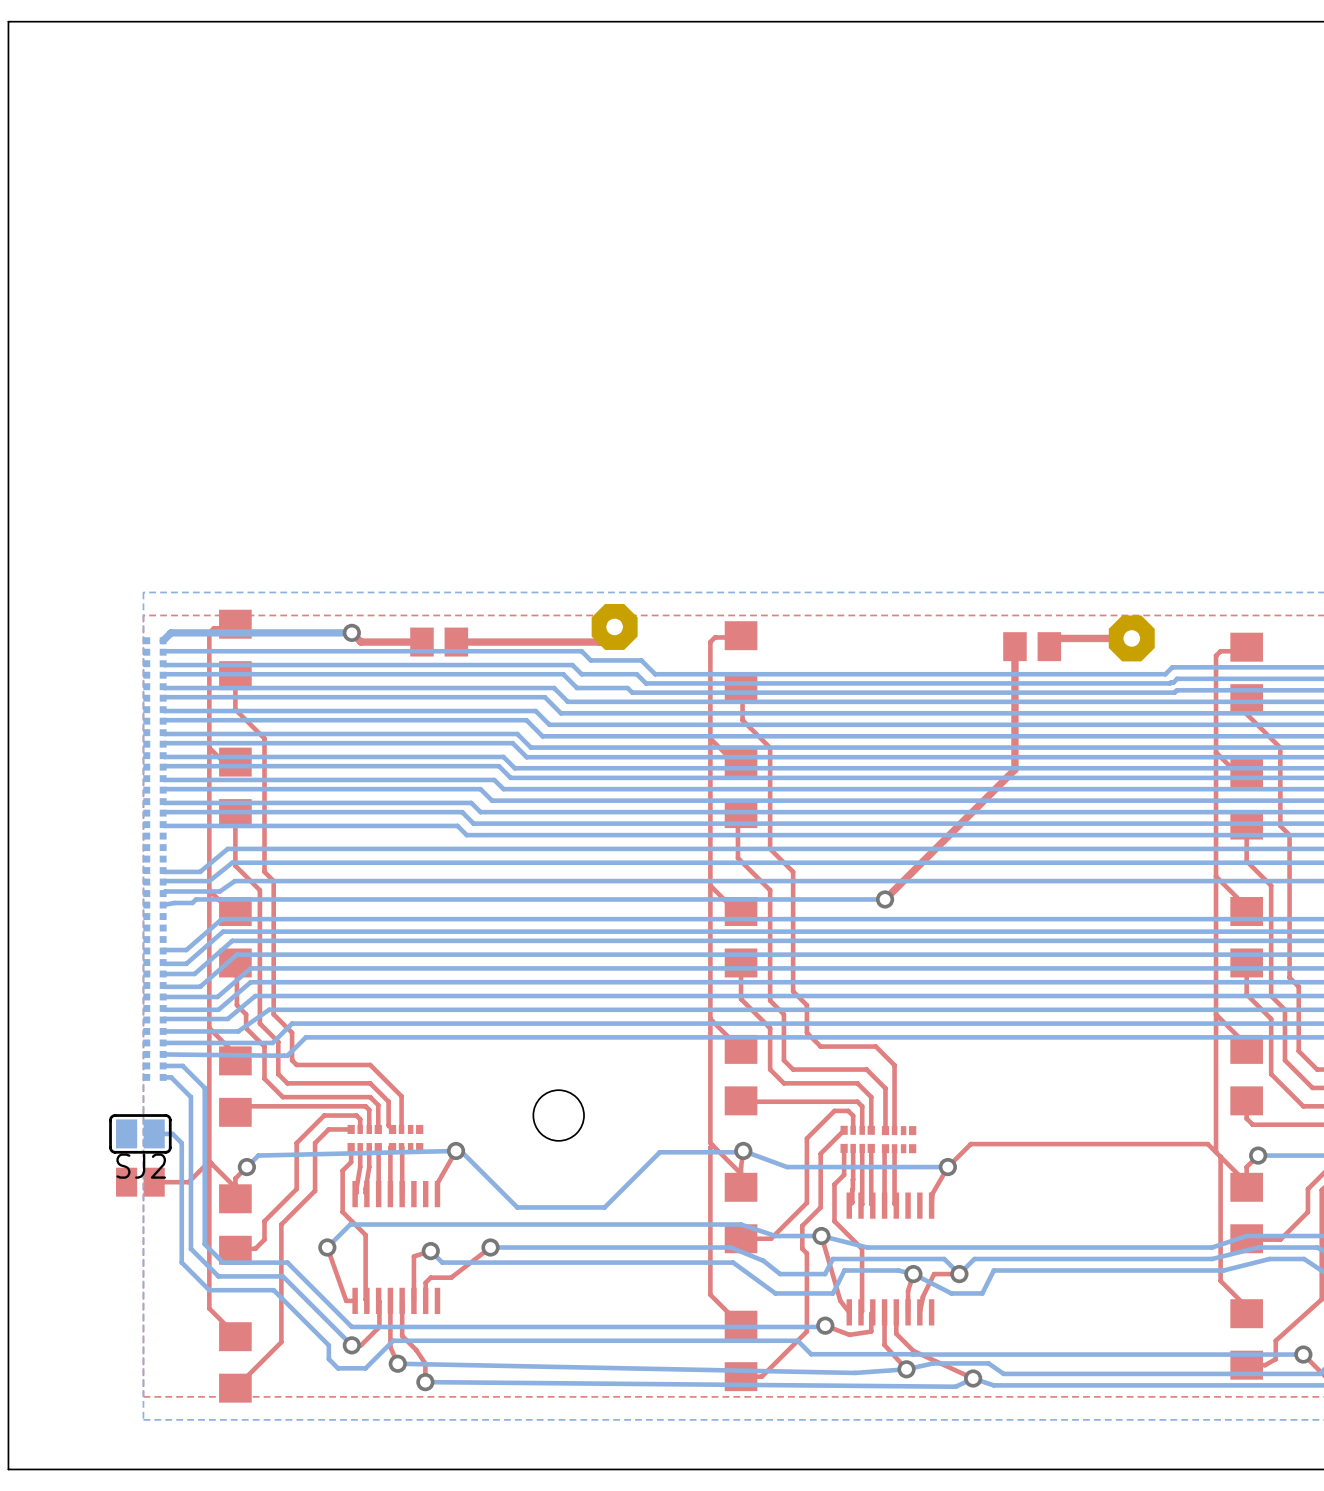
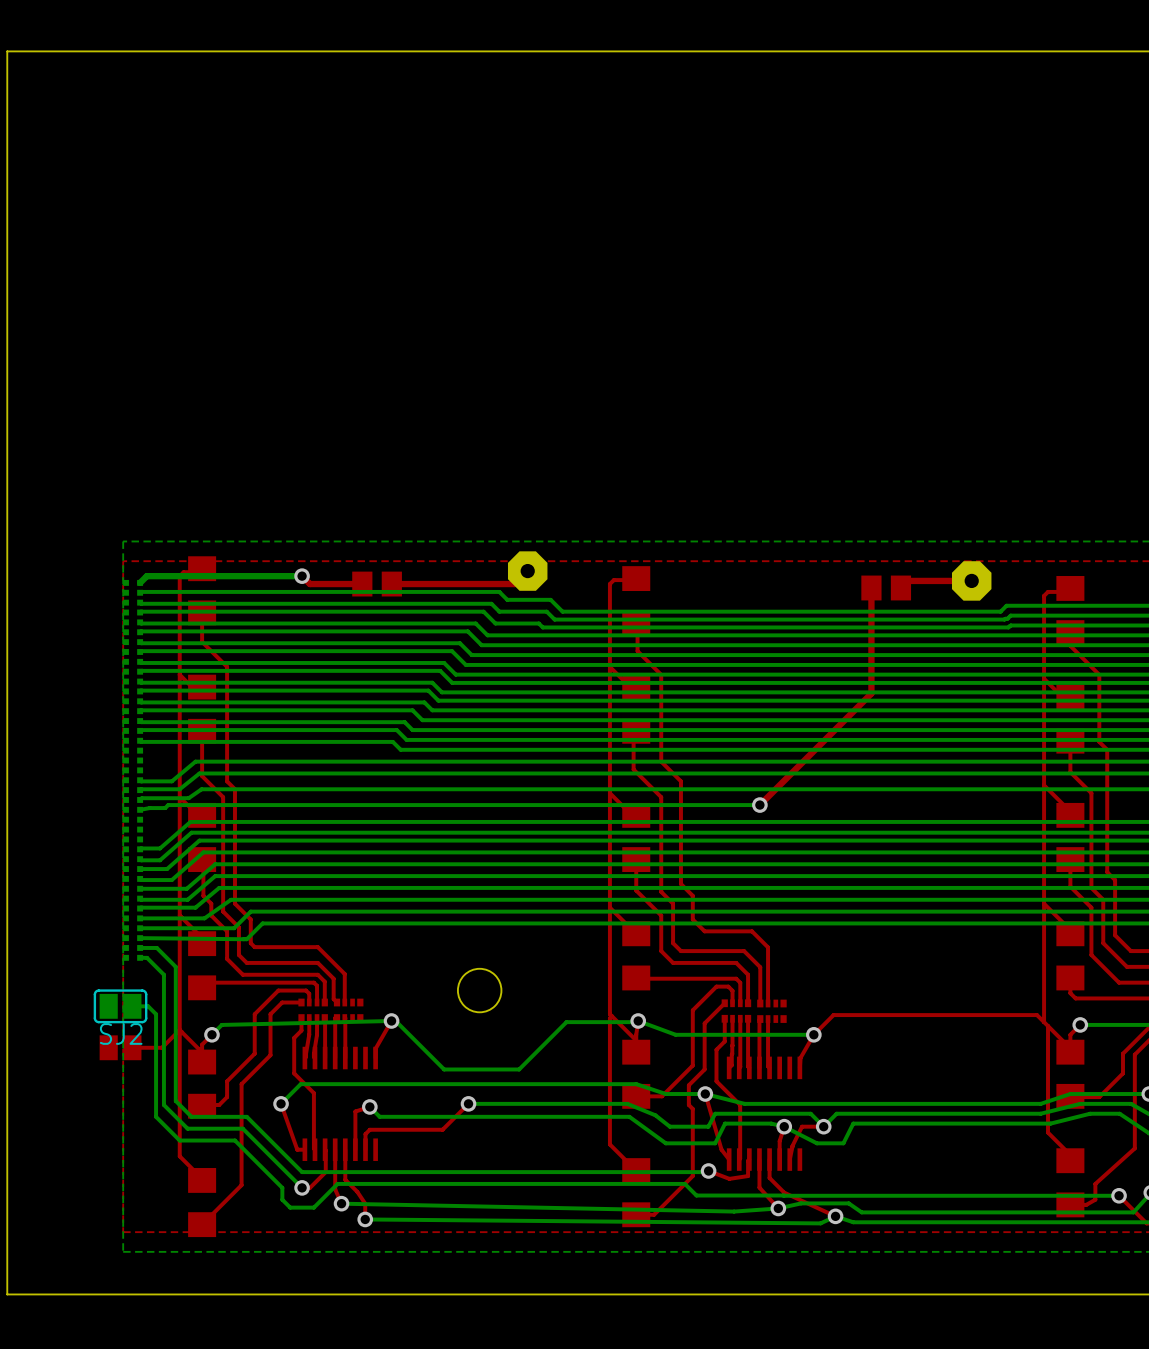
top track: (490, 1247) (451, 1277) -> (468, 1103) (442, 1129) (387, 1129)
via position: (490, 1247) -> (468, 1103)
bottom track: (545, 1247) (490, 1247) -> none

